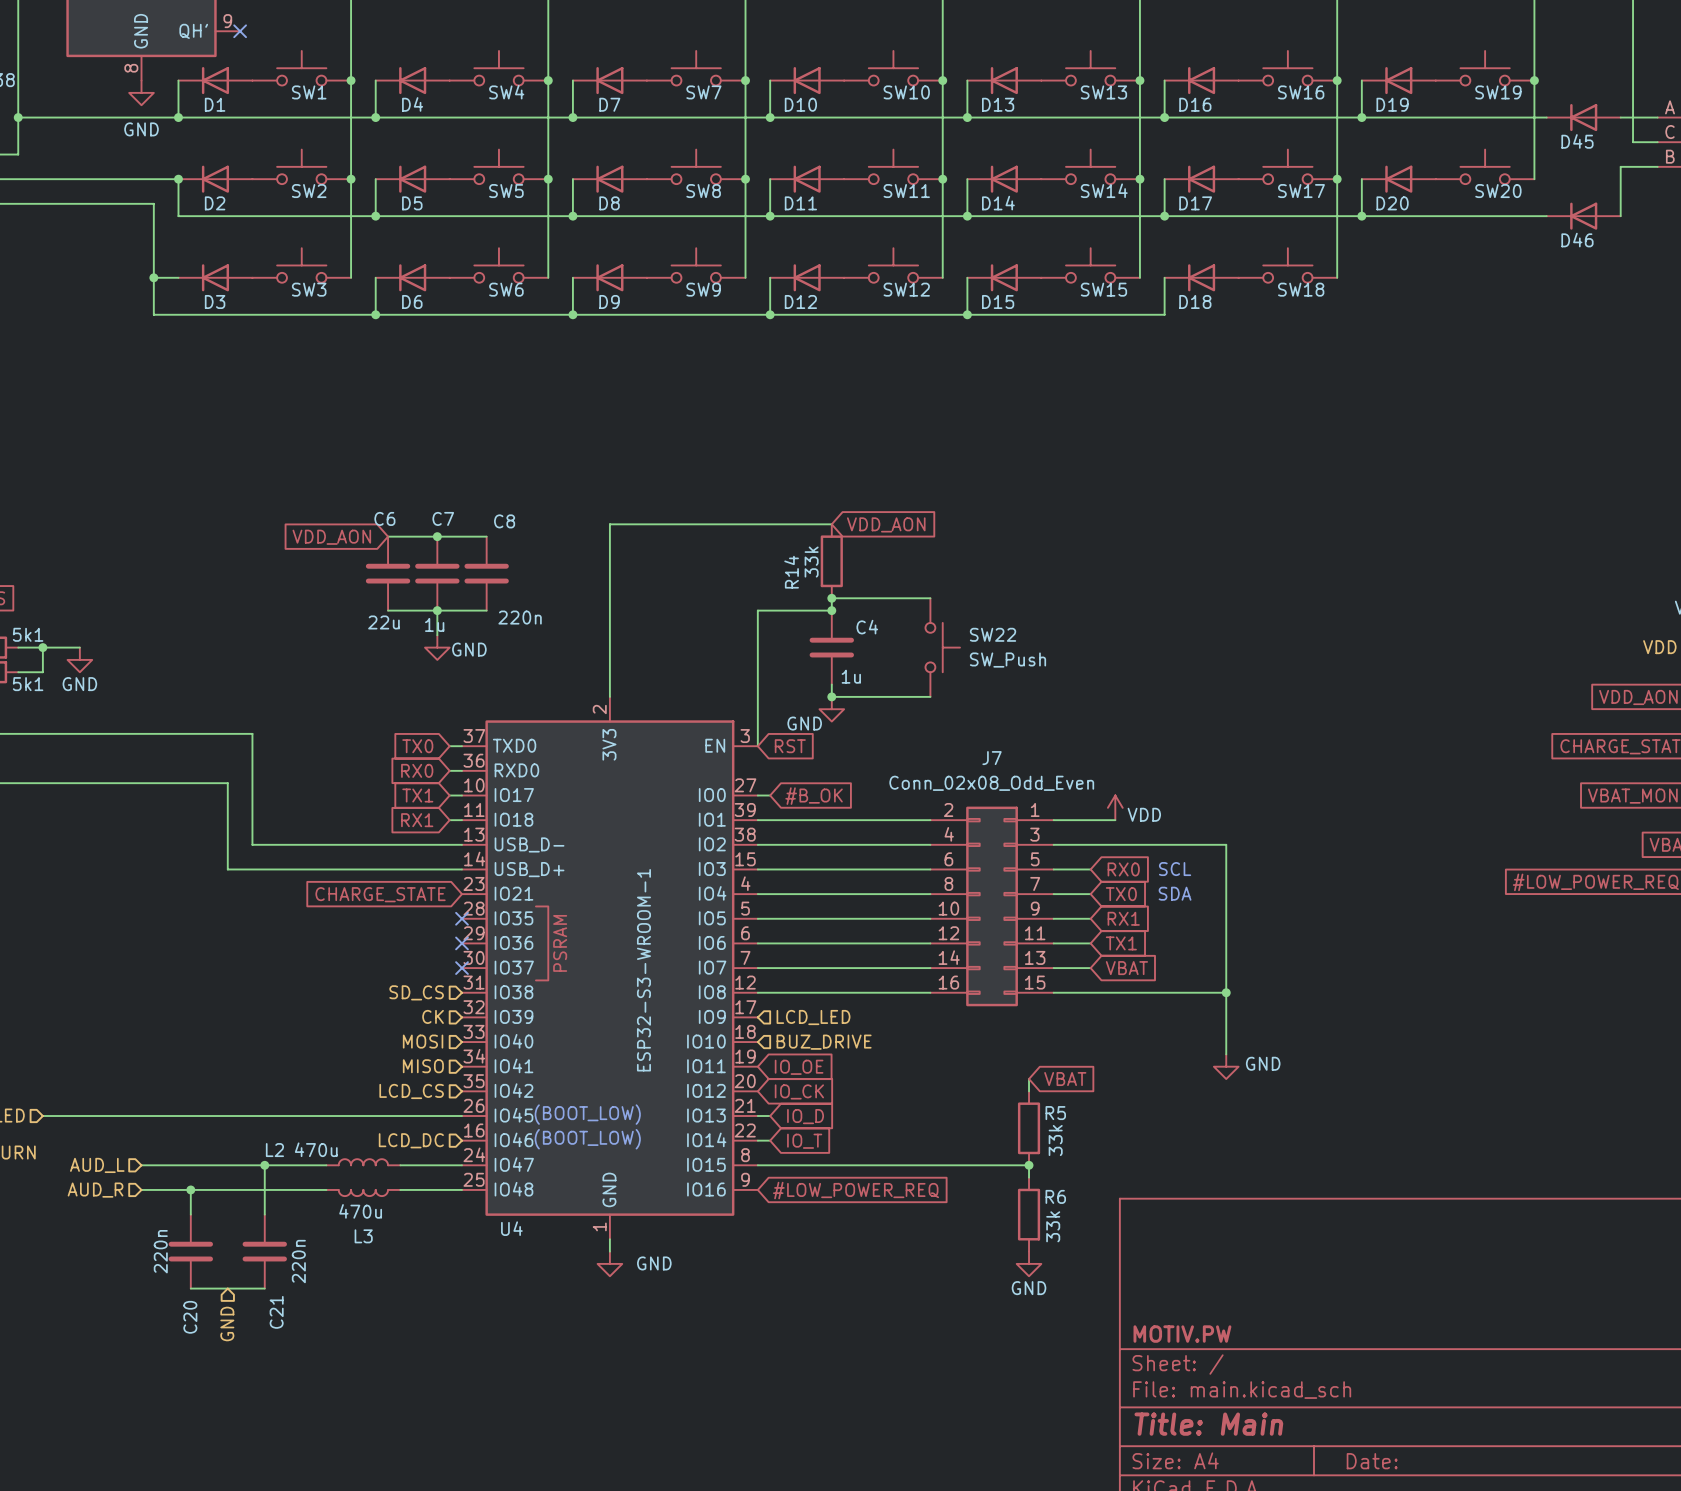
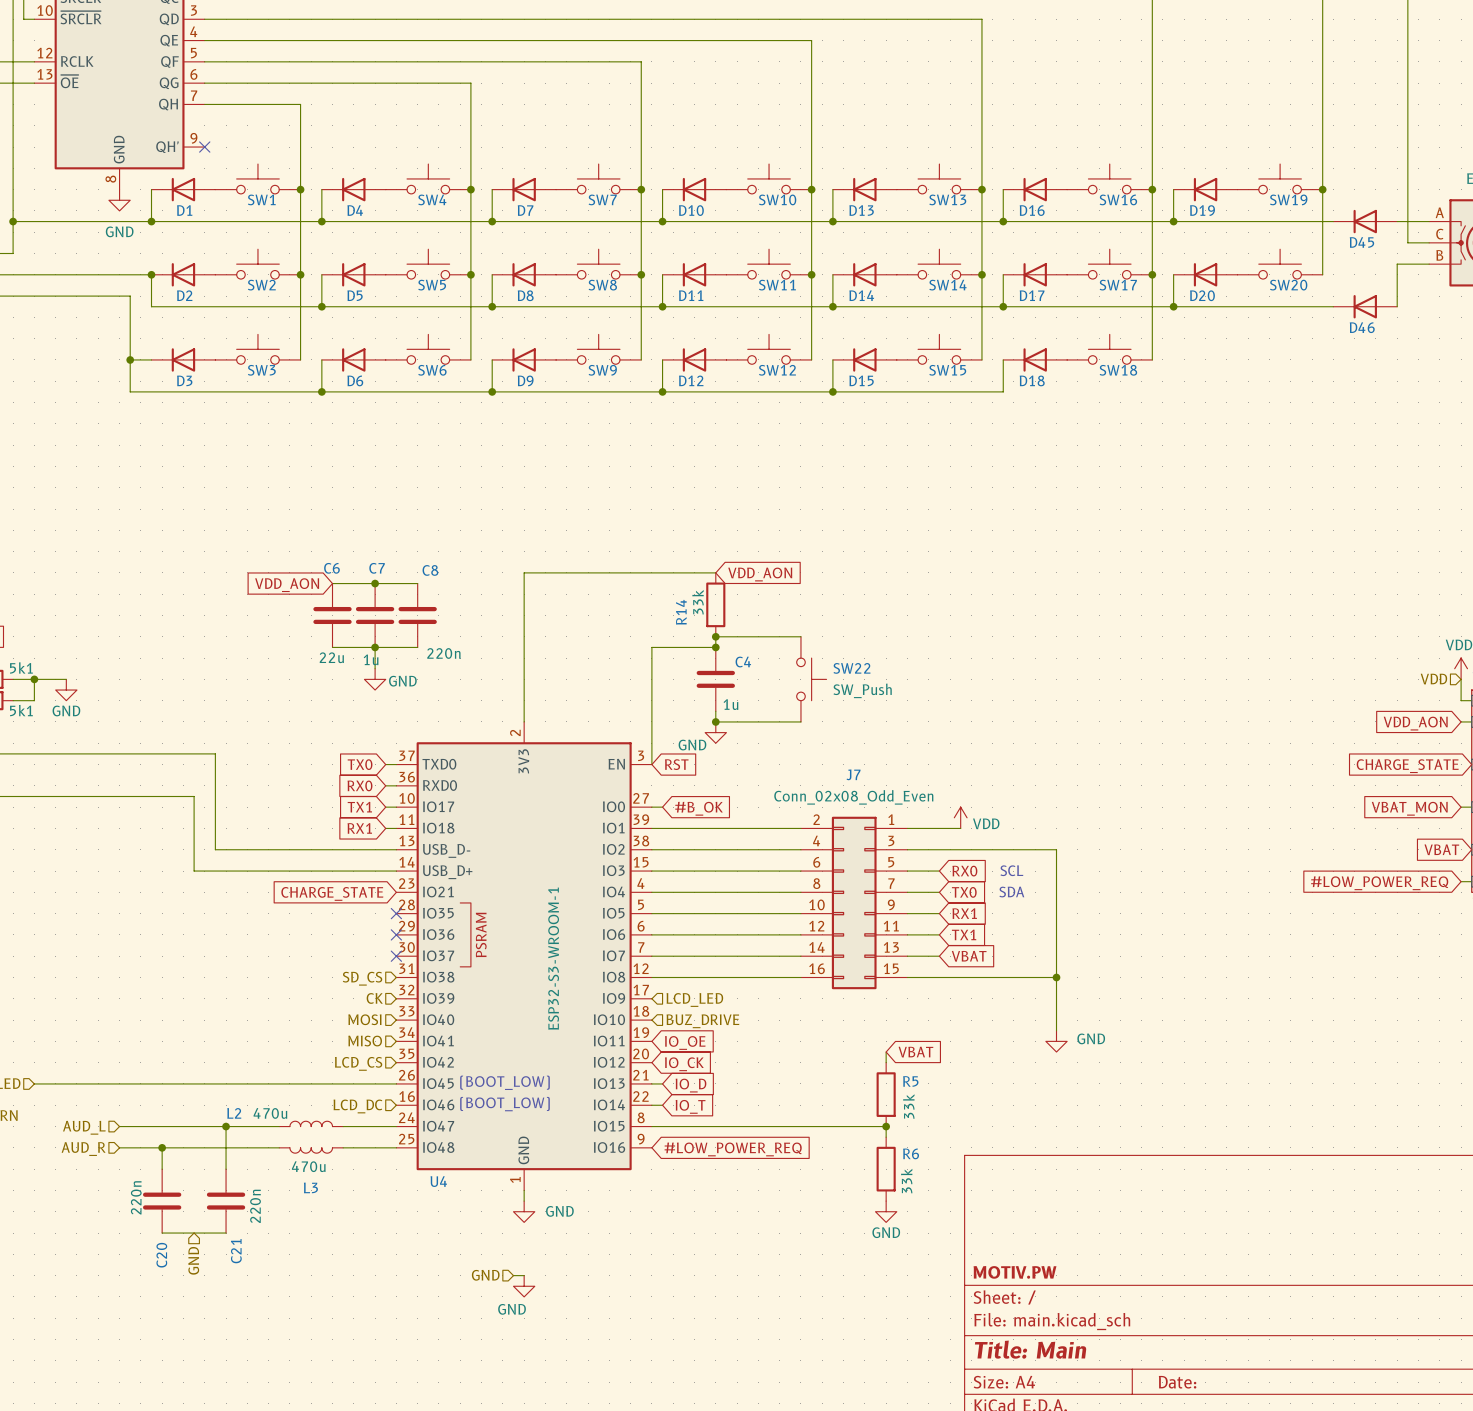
hierarchical label: none -> GND (485, 1275)
wire: none -> (513, 1275) (524, 1275)
power symbol: none -> GND (524, 1286)

